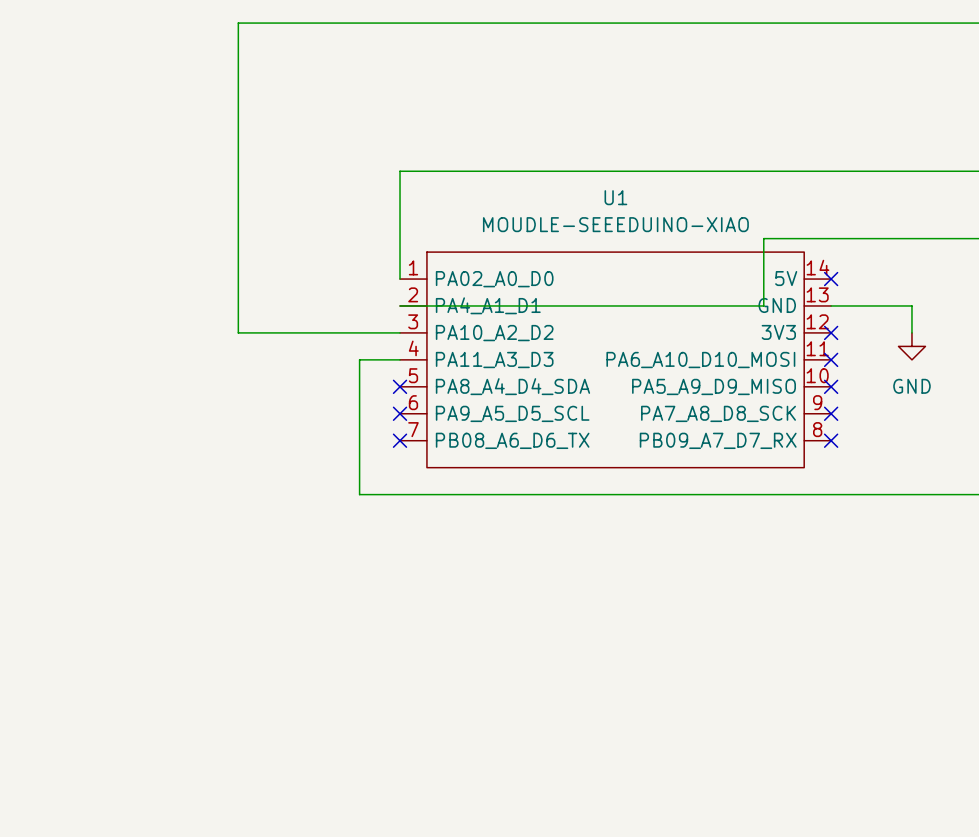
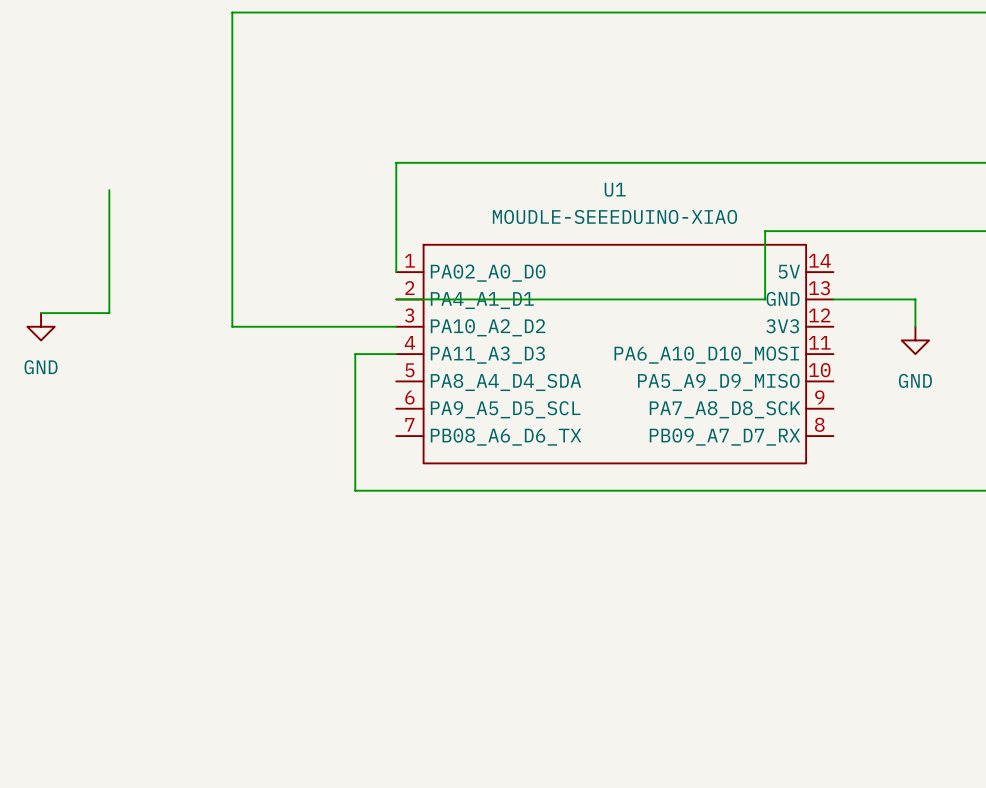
wire: none -> (109, 190) (109, 313) (41, 313)
no-connect mark: (831, 279) -> none
power symbol: none -> GND (41, 326)
no-connect mark: (831, 332) -> none
no-connect mark: (831, 359) -> none
no-connect mark: (400, 386) -> none
no-connect mark: (831, 386) -> none
no-connect mark: (400, 413) -> none
no-connect mark: (831, 413) -> none
no-connect mark: (400, 440) -> none
no-connect mark: (831, 440) -> none

